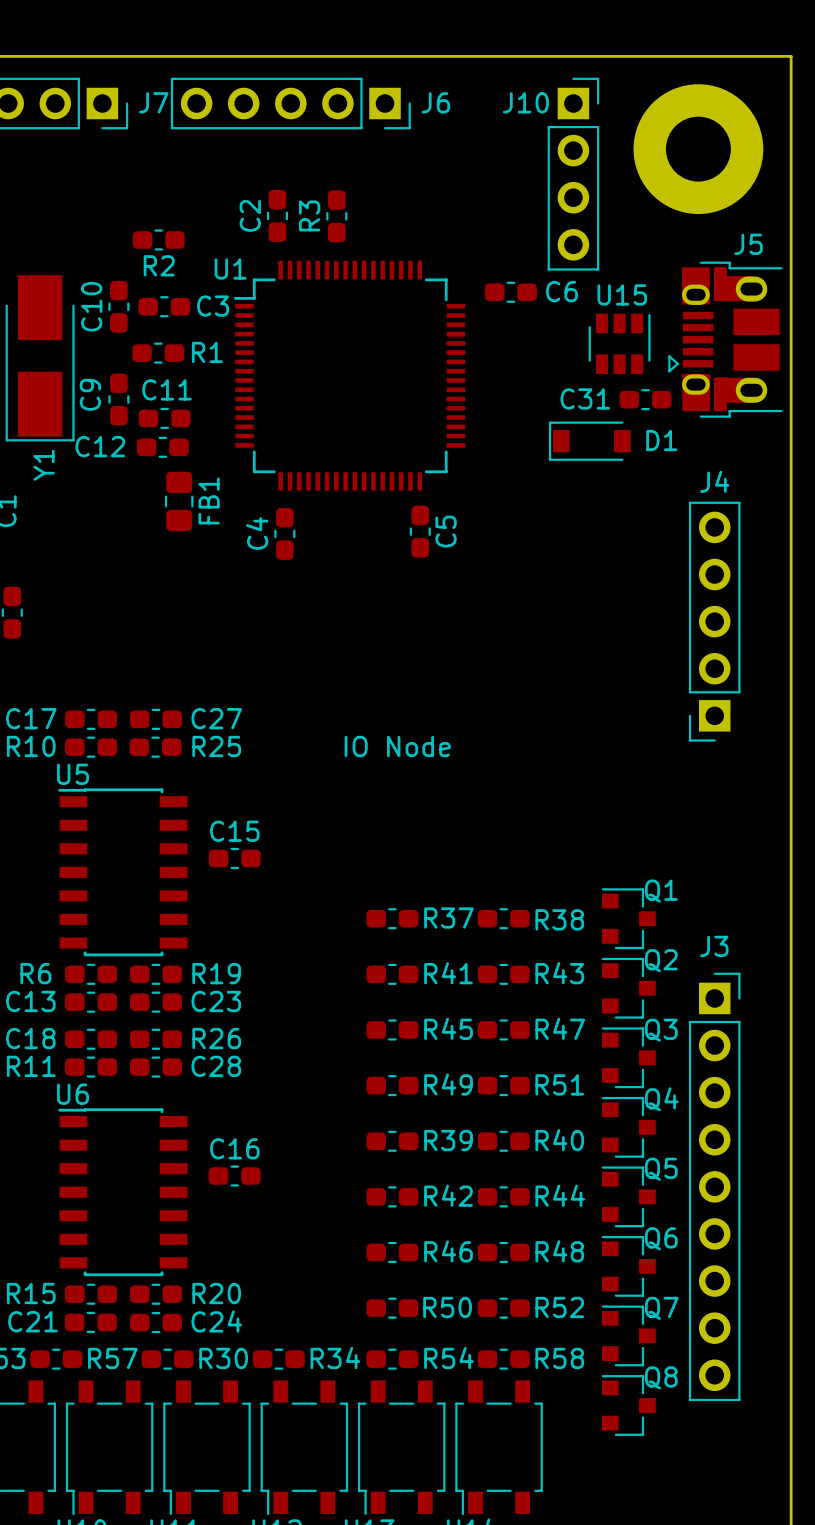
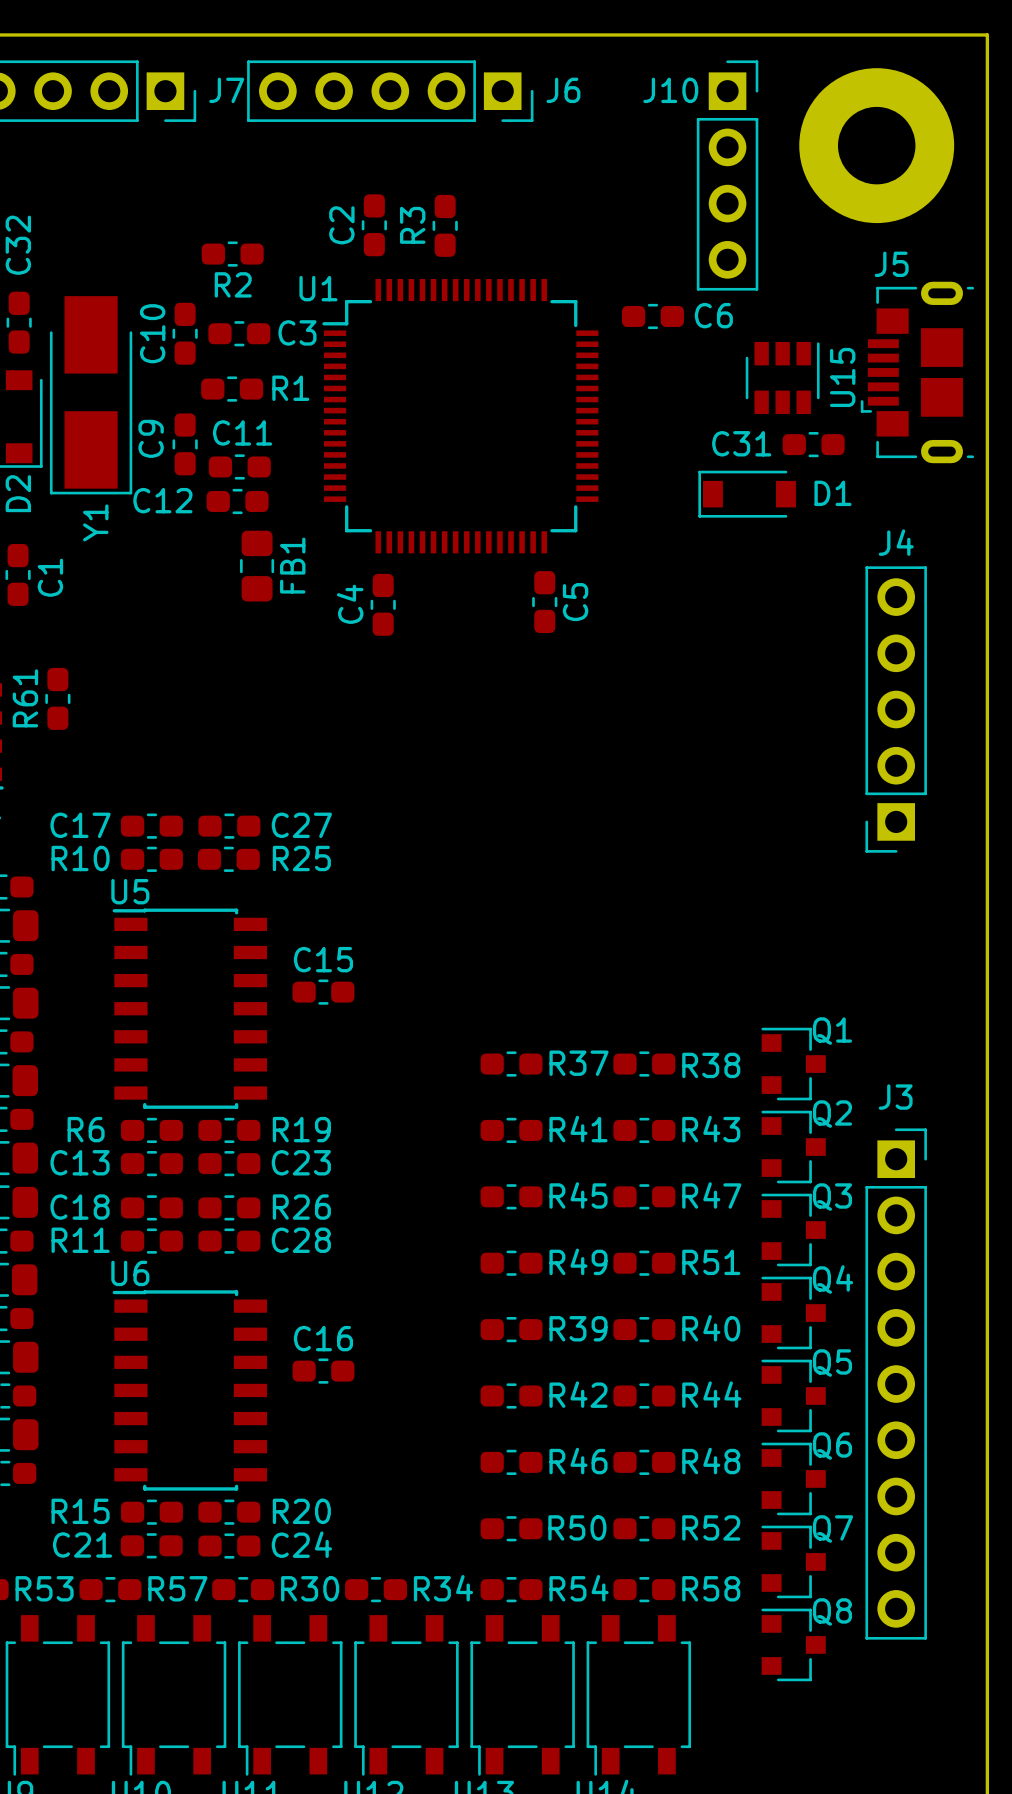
J5 name position: J5 (748, 244) -> J5 (891, 264)
J5 footprint: [668, 261, 783, 418] -> [860, 281, 975, 464]
U15 name rotation: 0° (622, 294) -> 90° counterclockwise (842, 377)
U15 name position: U15 (622, 294) -> U15 (842, 377)
text: IO Node (397, 746) -> none

